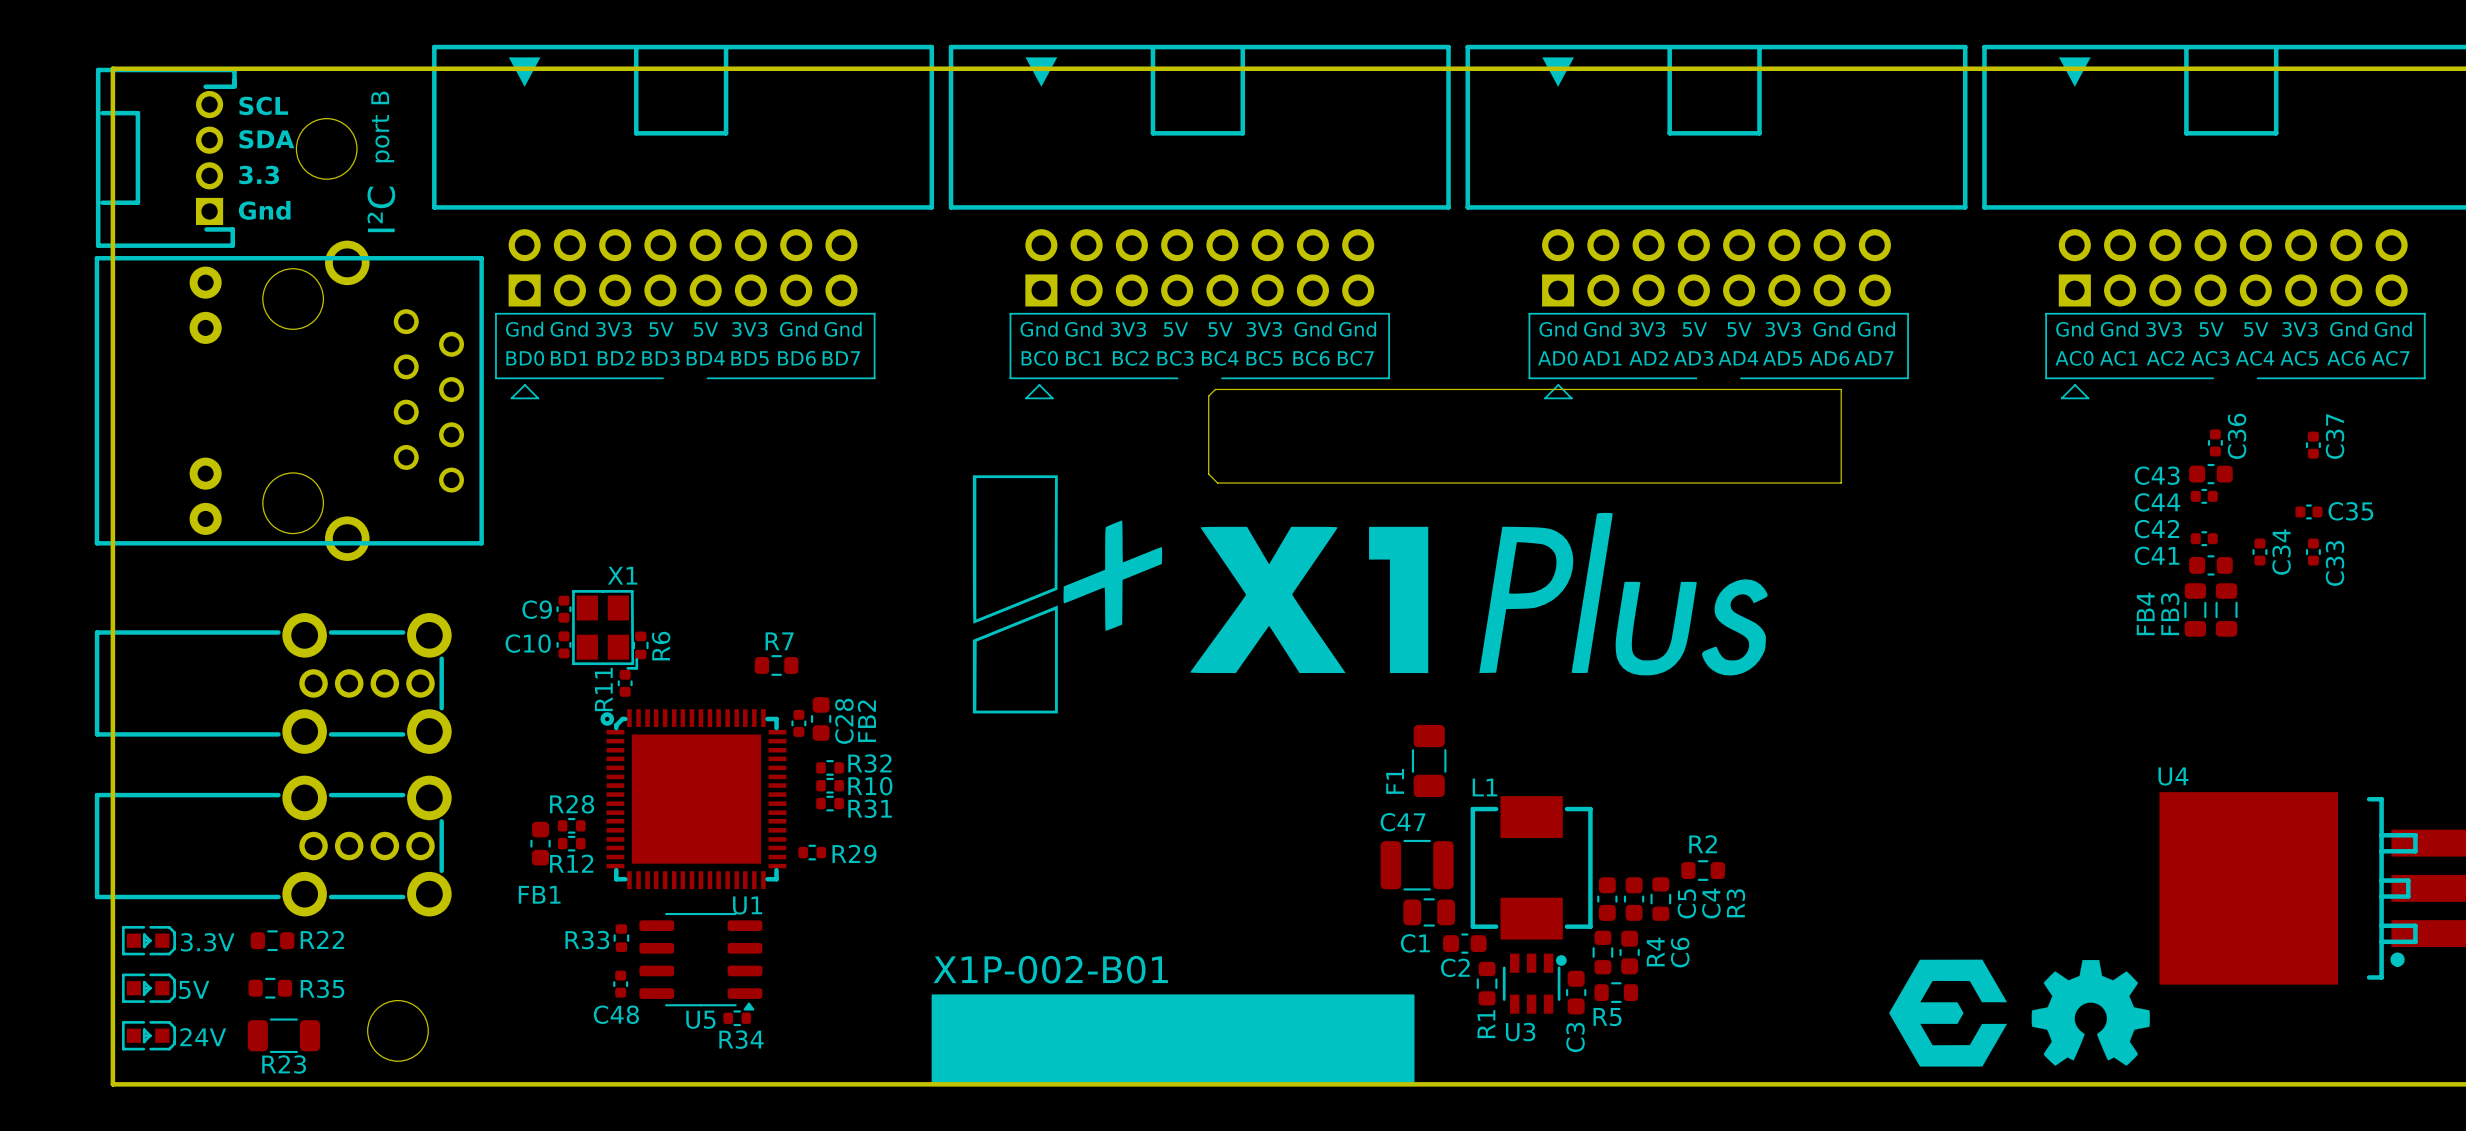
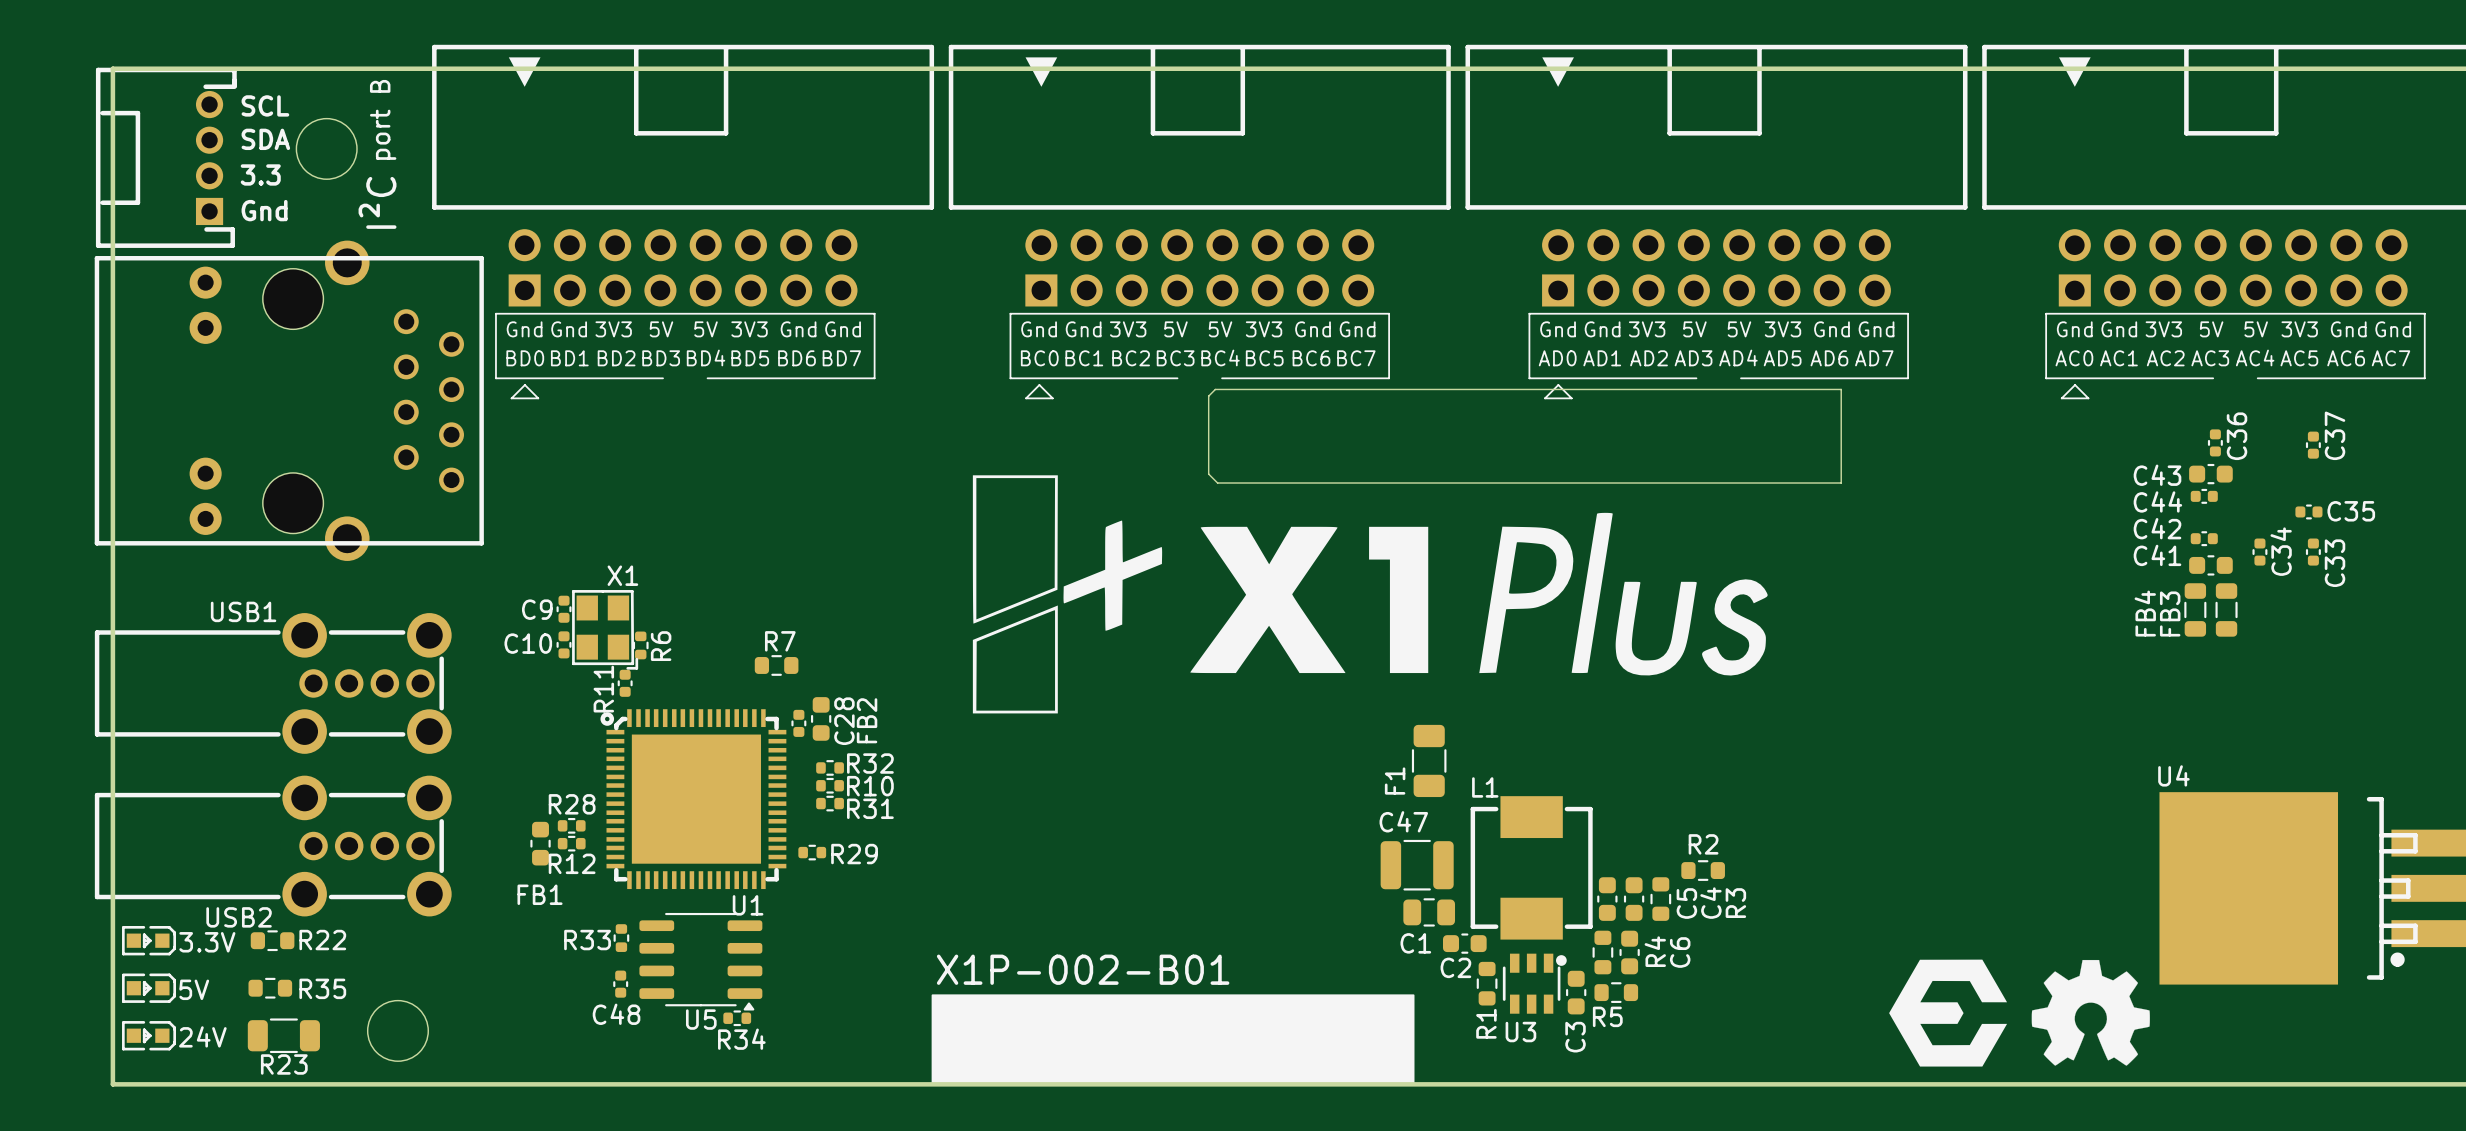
USB1 name: none -> USB1 (243, 611)
USB2 name: none -> USB2 (239, 917)

